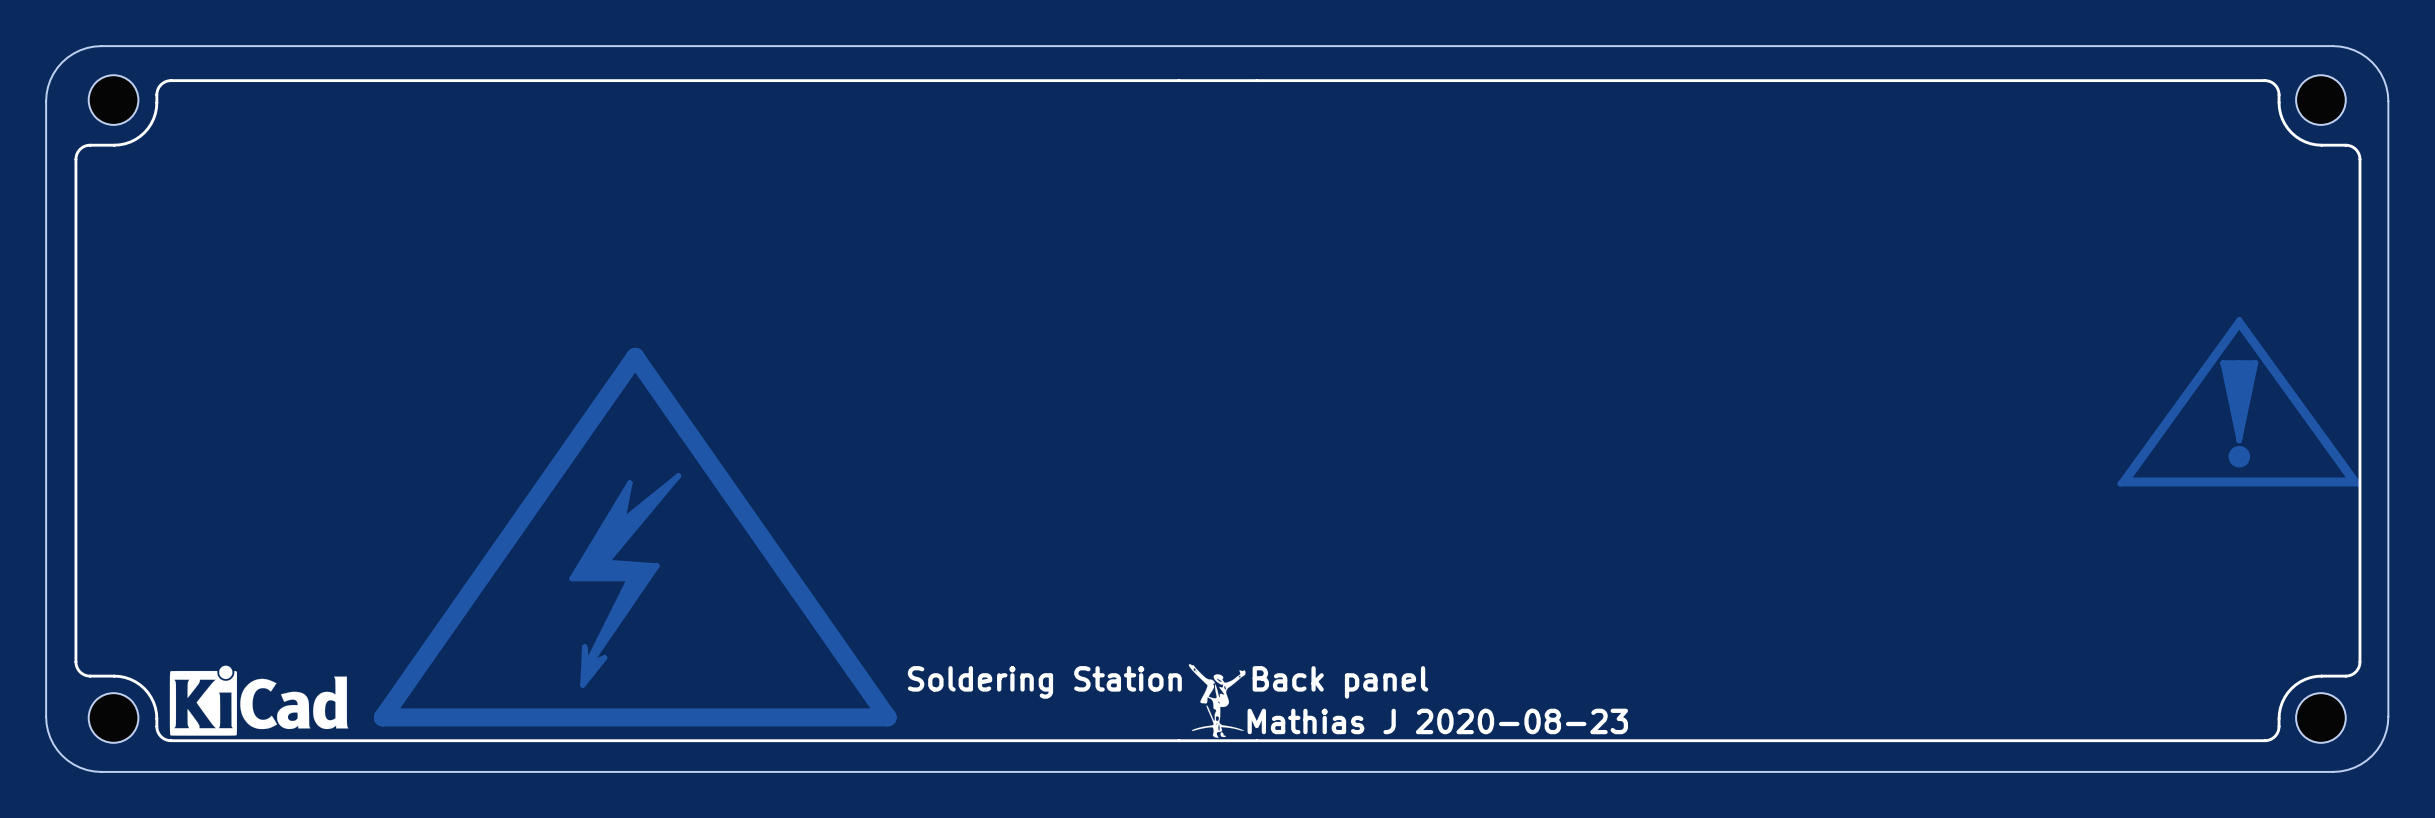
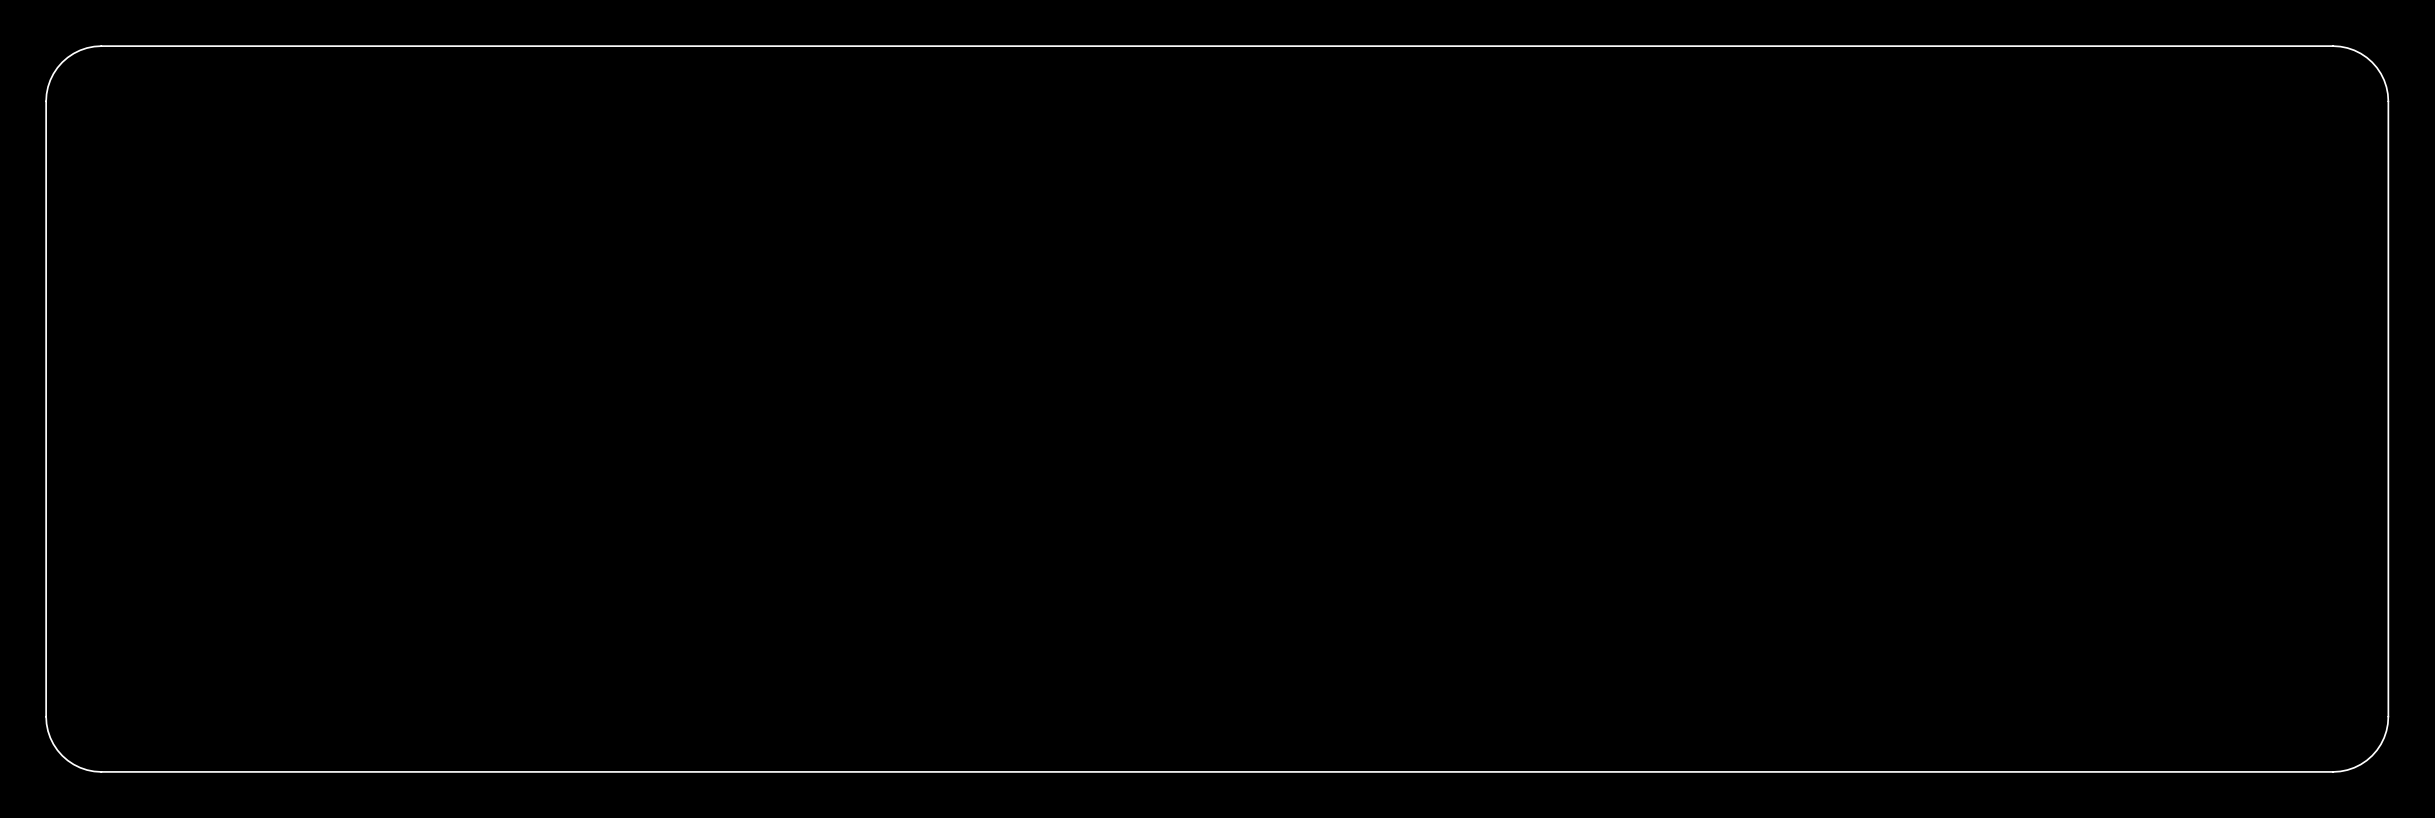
line: (171, 80) (2268, 81) (2277, 89) (2282, 118) (2295, 136) (2316, 144) (2349, 145) (2357, 150) (2359, 157) (2359, 665) (2355, 671) (2349, 675) (2316, 676) (2295, 684) (2282, 702) (2277, 733) (2271, 738) (2264, 740) (167, 740) (157, 731) (153, 702) (140, 684) (119, 676) (86, 675) (80, 671) (76, 663) (75, 159) (78, 150) (84, 146) (119, 144) (140, 136) (153, 118) (158, 87) (163, 82) (171, 80) -> none
part: (113, 100) -> none
part: (2320, 100) -> none
drawing: [2117, 316, 2361, 487] -> none
drawing: [373, 347, 897, 727] -> none
drawing: [1188, 664, 1246, 738] -> none
drawing: [169, 665, 349, 736] -> none
text: Soldering Station Back panel (1168, 682) -> none
part: (113, 717) -> none
part: (2320, 717) -> none
text: Mathias J 2020-08-23 (1437, 721) -> none

